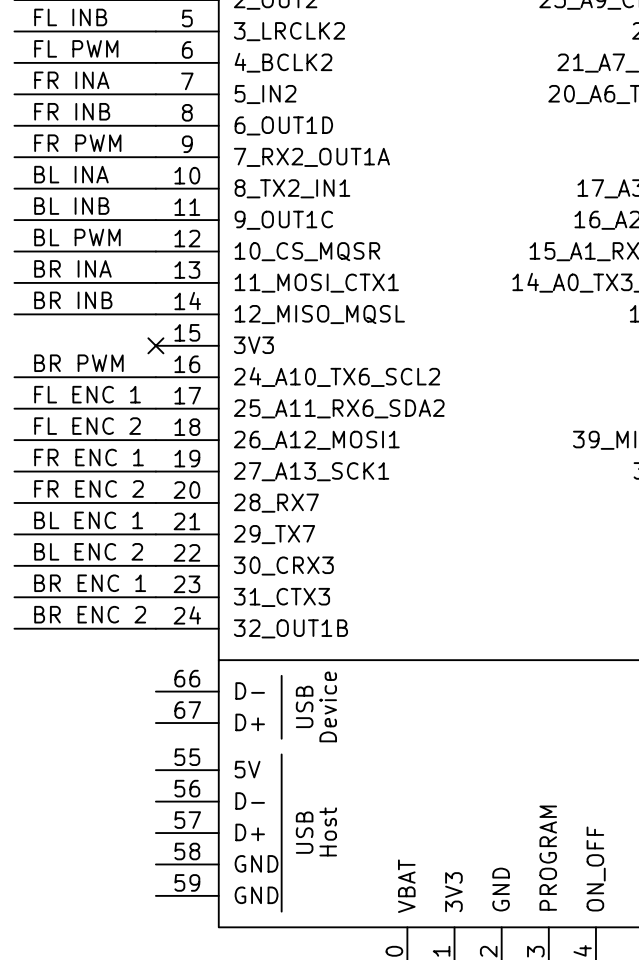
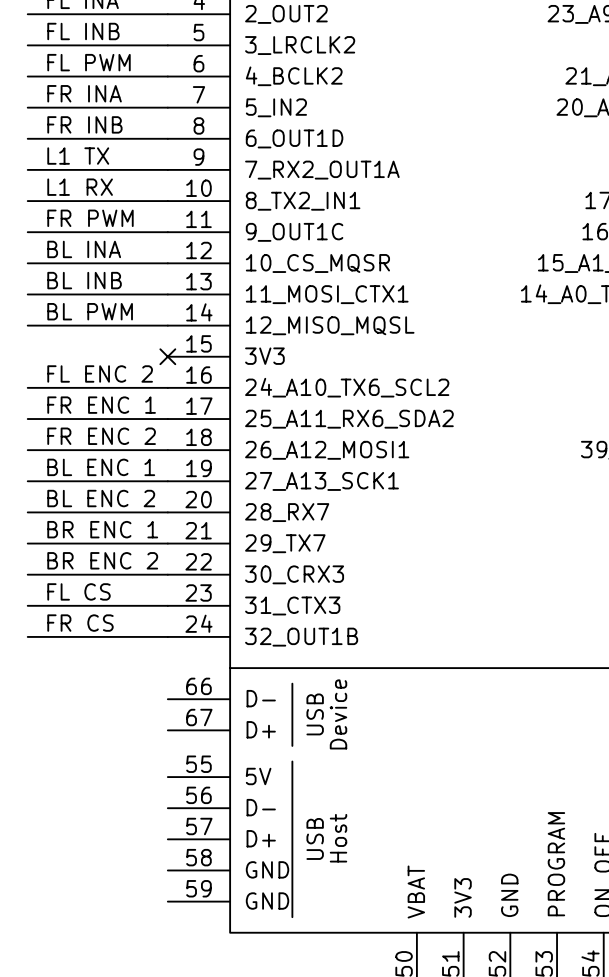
label: FR PWM (77, 143) -> L1 TX (78, 156)
label: BL INA (71, 174) -> L1 RX (80, 187)
label: BL INB (71, 206) -> FR PWM (90, 218)
label: BL PWM (77, 237) -> BL INA (84, 249)
label: BR INA (72, 268) -> BL INB (84, 280)
label: BR INB (73, 300) -> BL PWM (90, 311)
label: BR PWM (78, 363) -> FL ENC 2 (100, 373)
label: FL ENC 1 (87, 394) -> FR ENC 1 (101, 405)
label: FL ENC 2 (87, 426) -> FR ENC 2 (101, 436)
label: FR ENC 1 (89, 457) -> BL ENC 1 (101, 467)
label: FR ENC 2 (89, 488) -> BL ENC 2 (101, 498)
label: BL ENC 1 (88, 520) -> BR ENC 1 (102, 529)
label: BL ENC 2 (88, 551) -> BR ENC 2 (102, 560)
label: BR ENC 1 (90, 583) -> FL CS (79, 591)
label: BR ENC 2 (90, 614) -> FR CS (80, 623)

